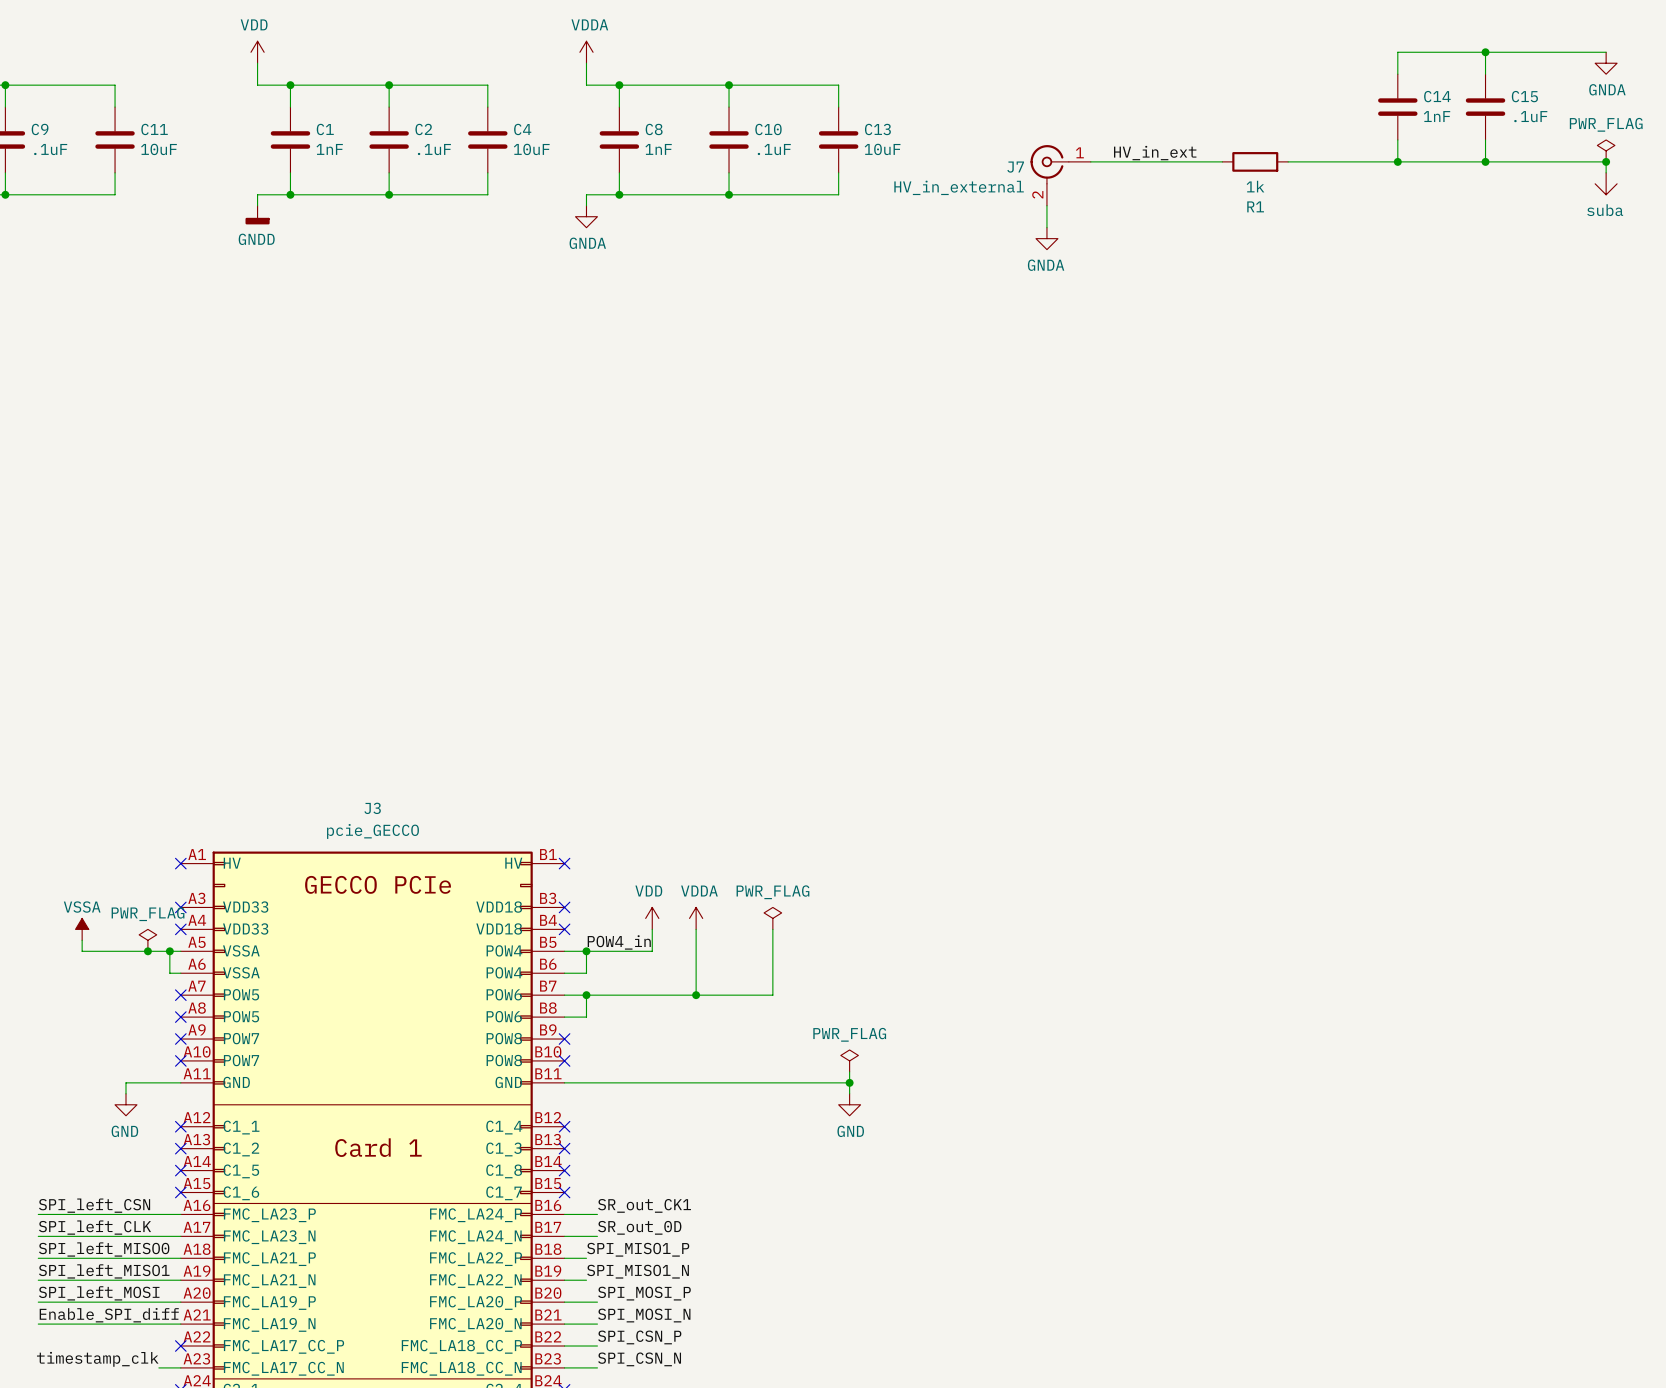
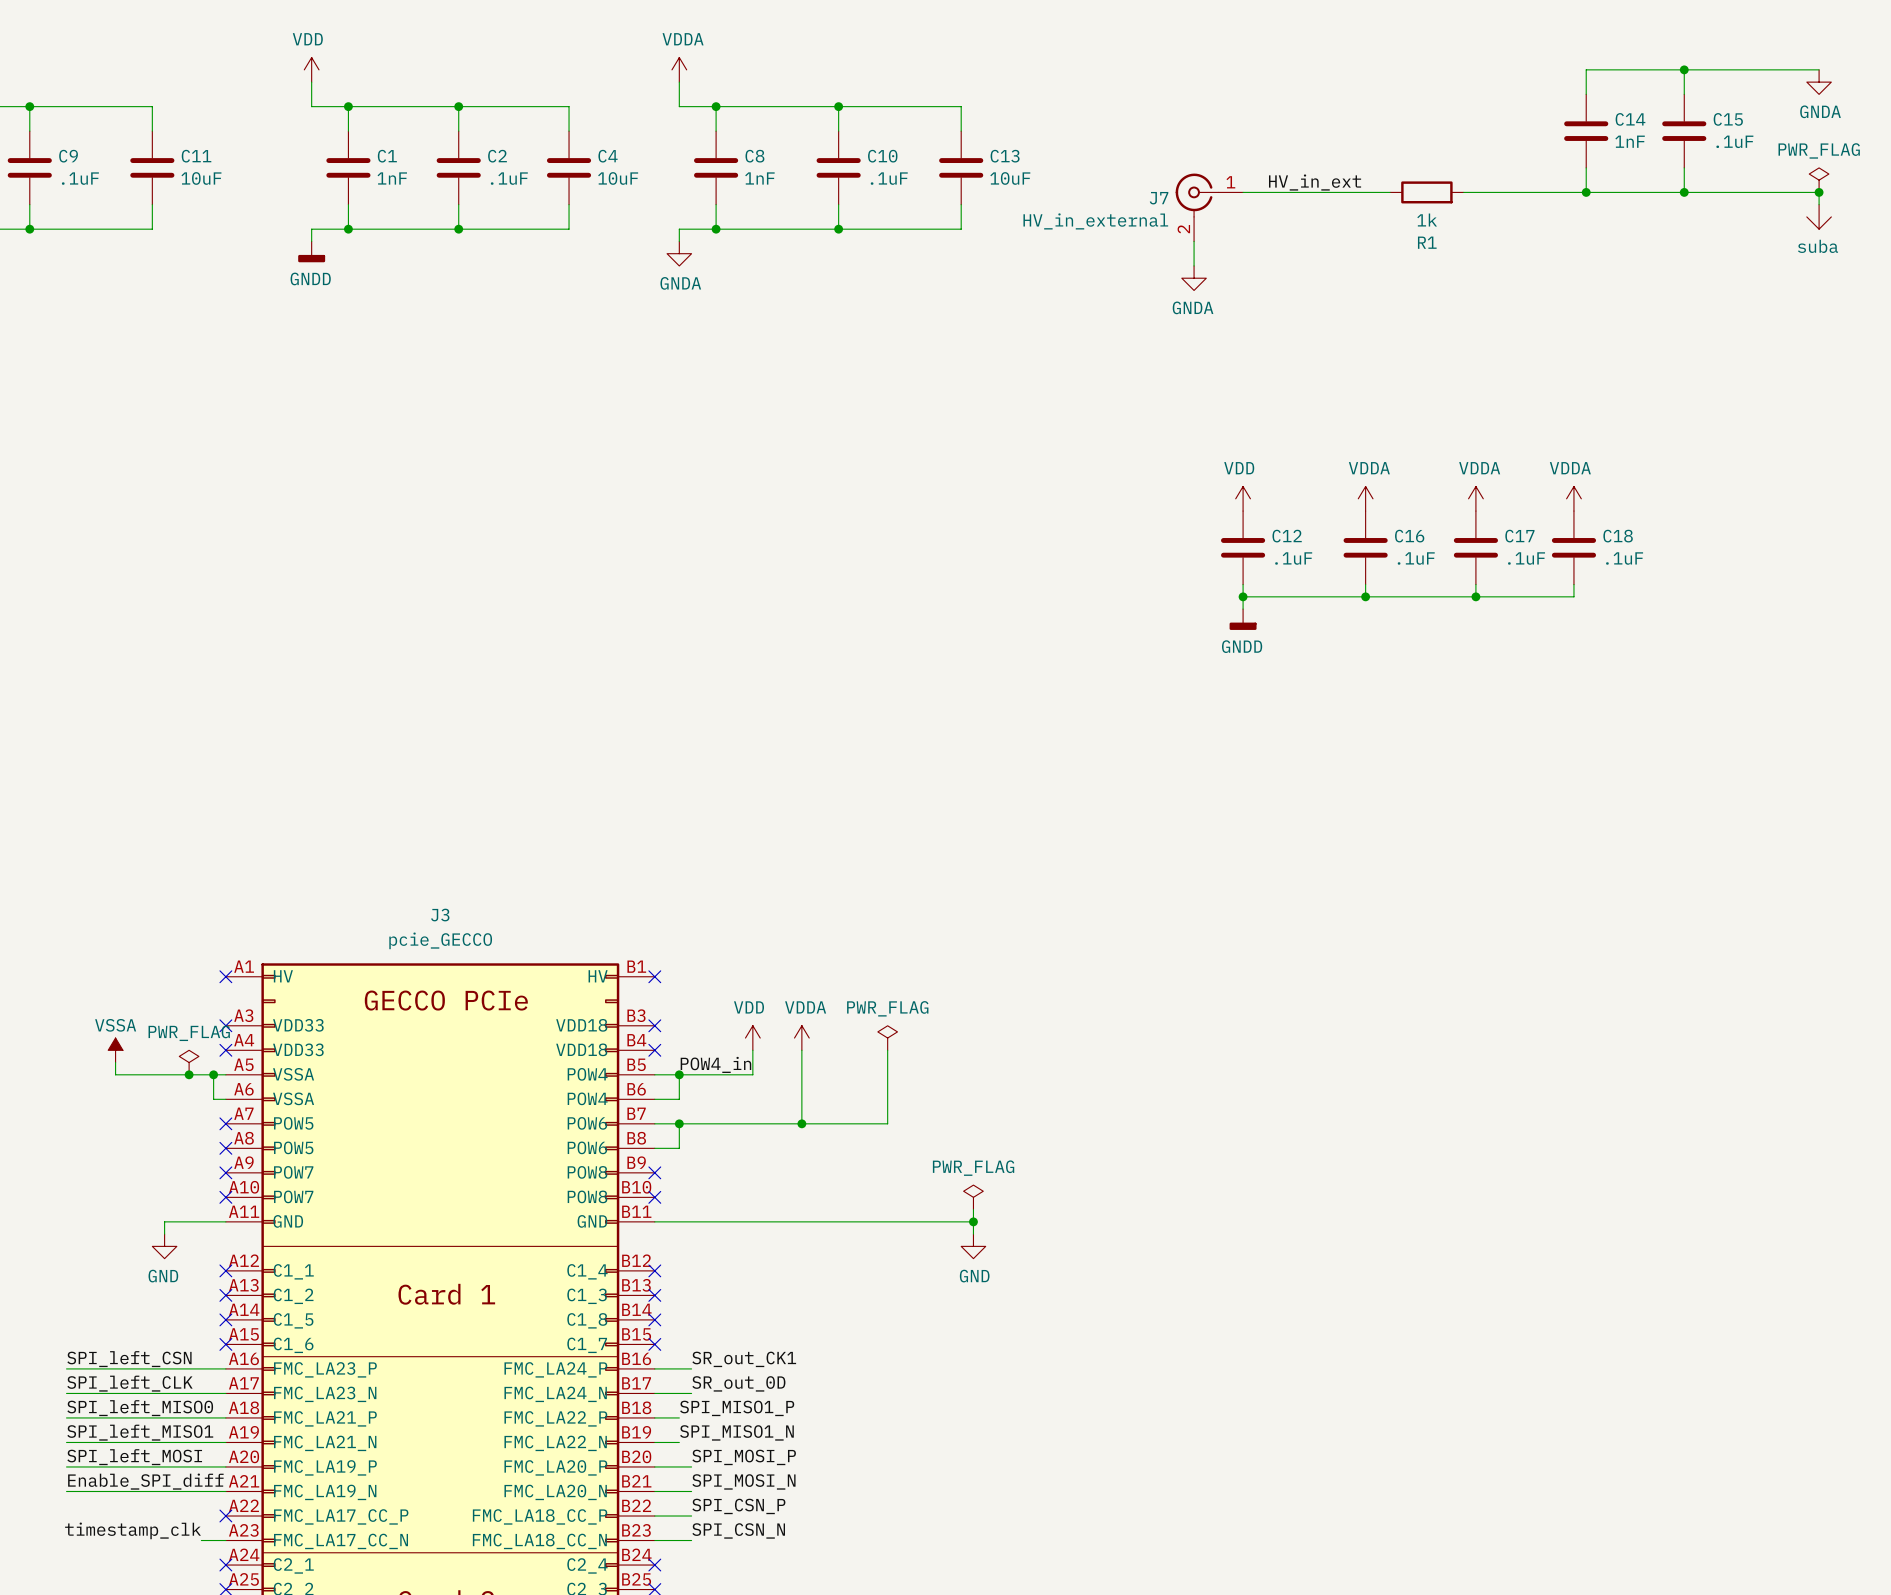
power symbol: none -> VDD (1243, 498)
power symbol: none -> VDDA (1365, 498)
power symbol: none -> VDDA (1475, 498)
power symbol: none -> VDDA (1573, 498)
C12: none -> .1uF (1243, 547)
C16: none -> .1uF (1365, 547)
C17: none -> .1uF (1475, 547)
C18: none -> .1uF (1573, 547)
wire: none -> (1243, 584) (1243, 609)
wire: none -> (1365, 584) (1365, 596)
wire: none -> (1475, 584) (1475, 596)
wire: none -> (1573, 584) (1573, 596) (1243, 596)
junction: none -> (1243, 596)
junction: none -> (1365, 596)
junction: none -> (1475, 596)
power symbol: none -> GNDD (1243, 619)

